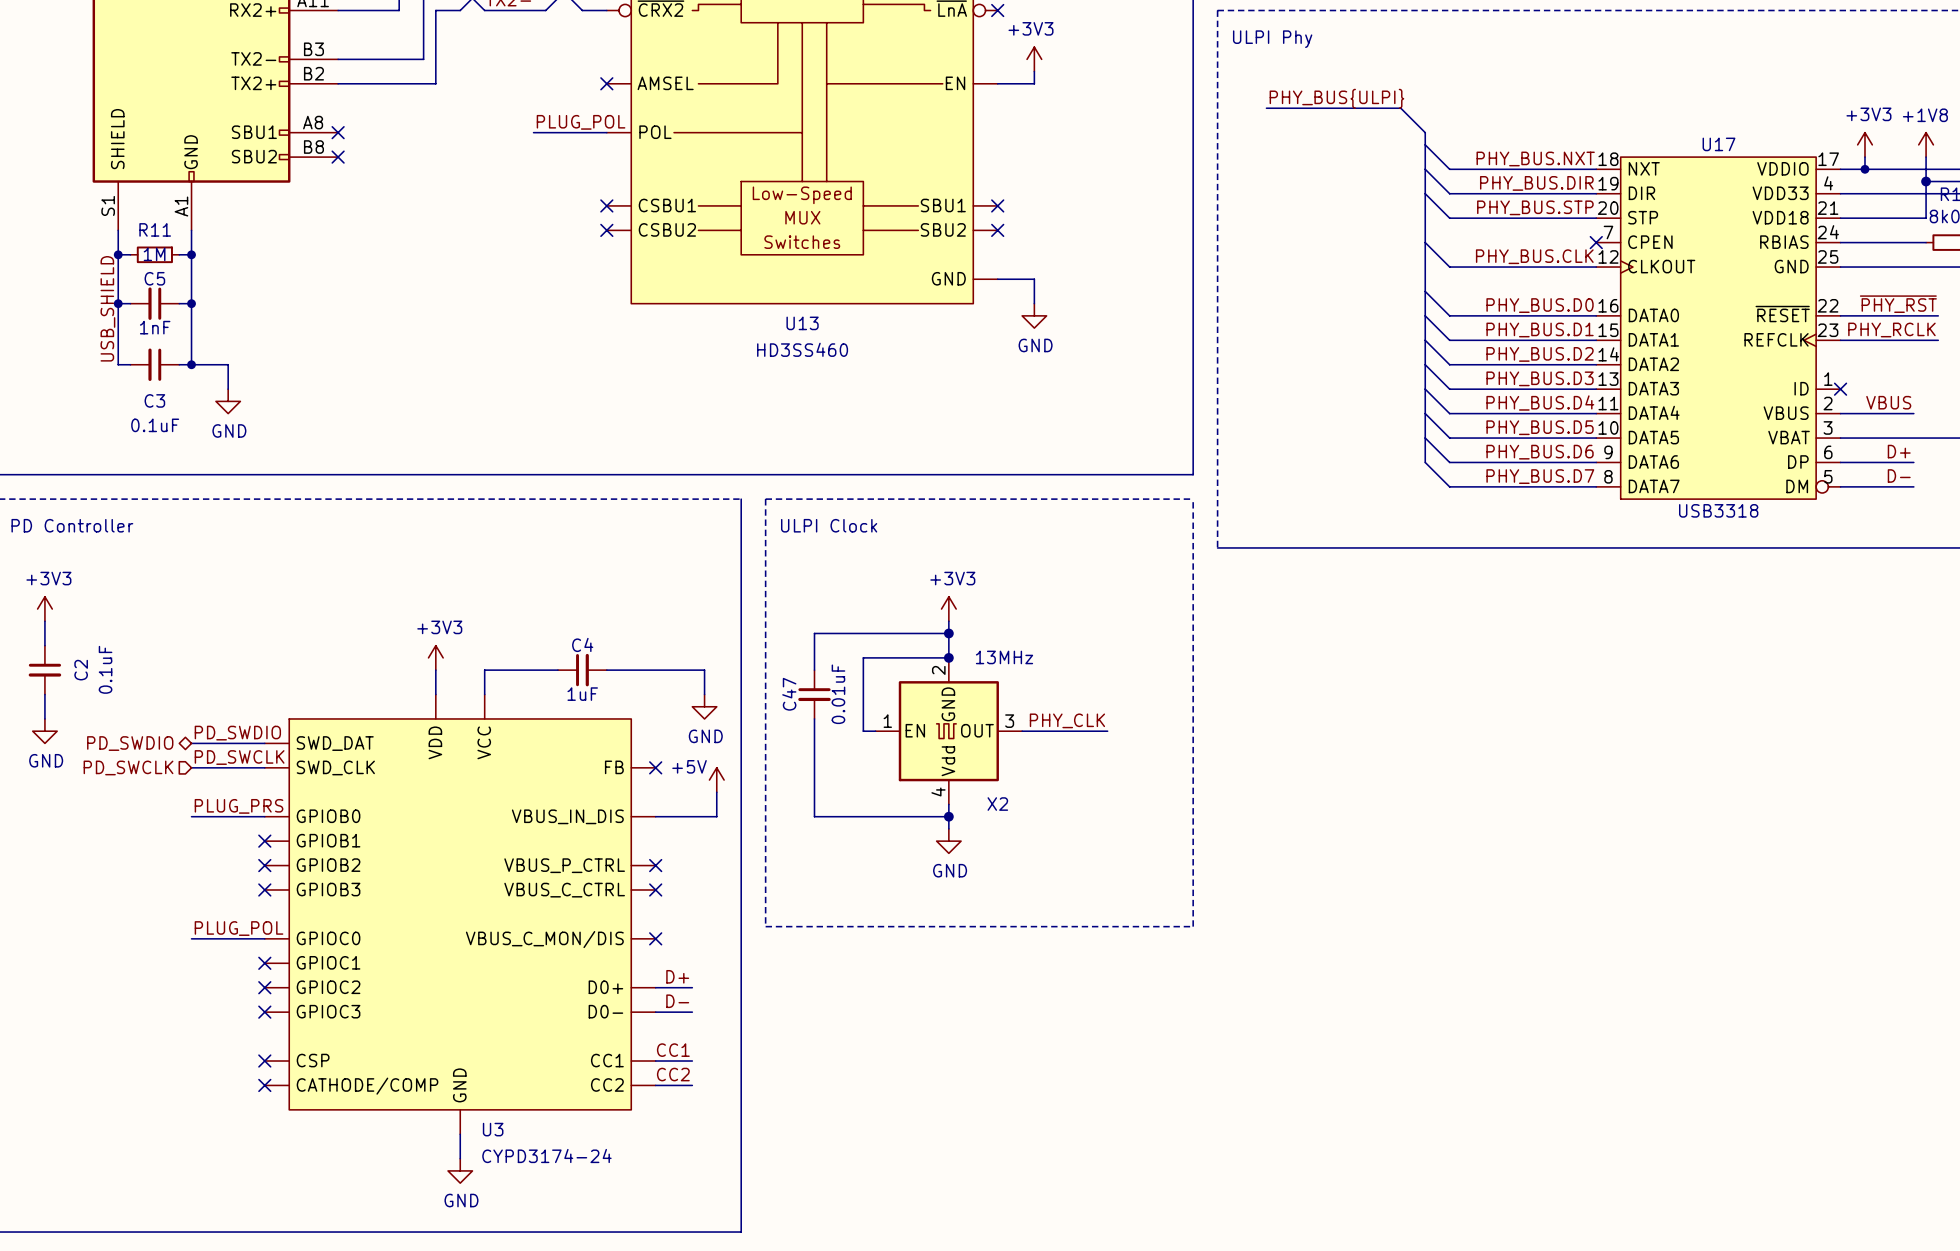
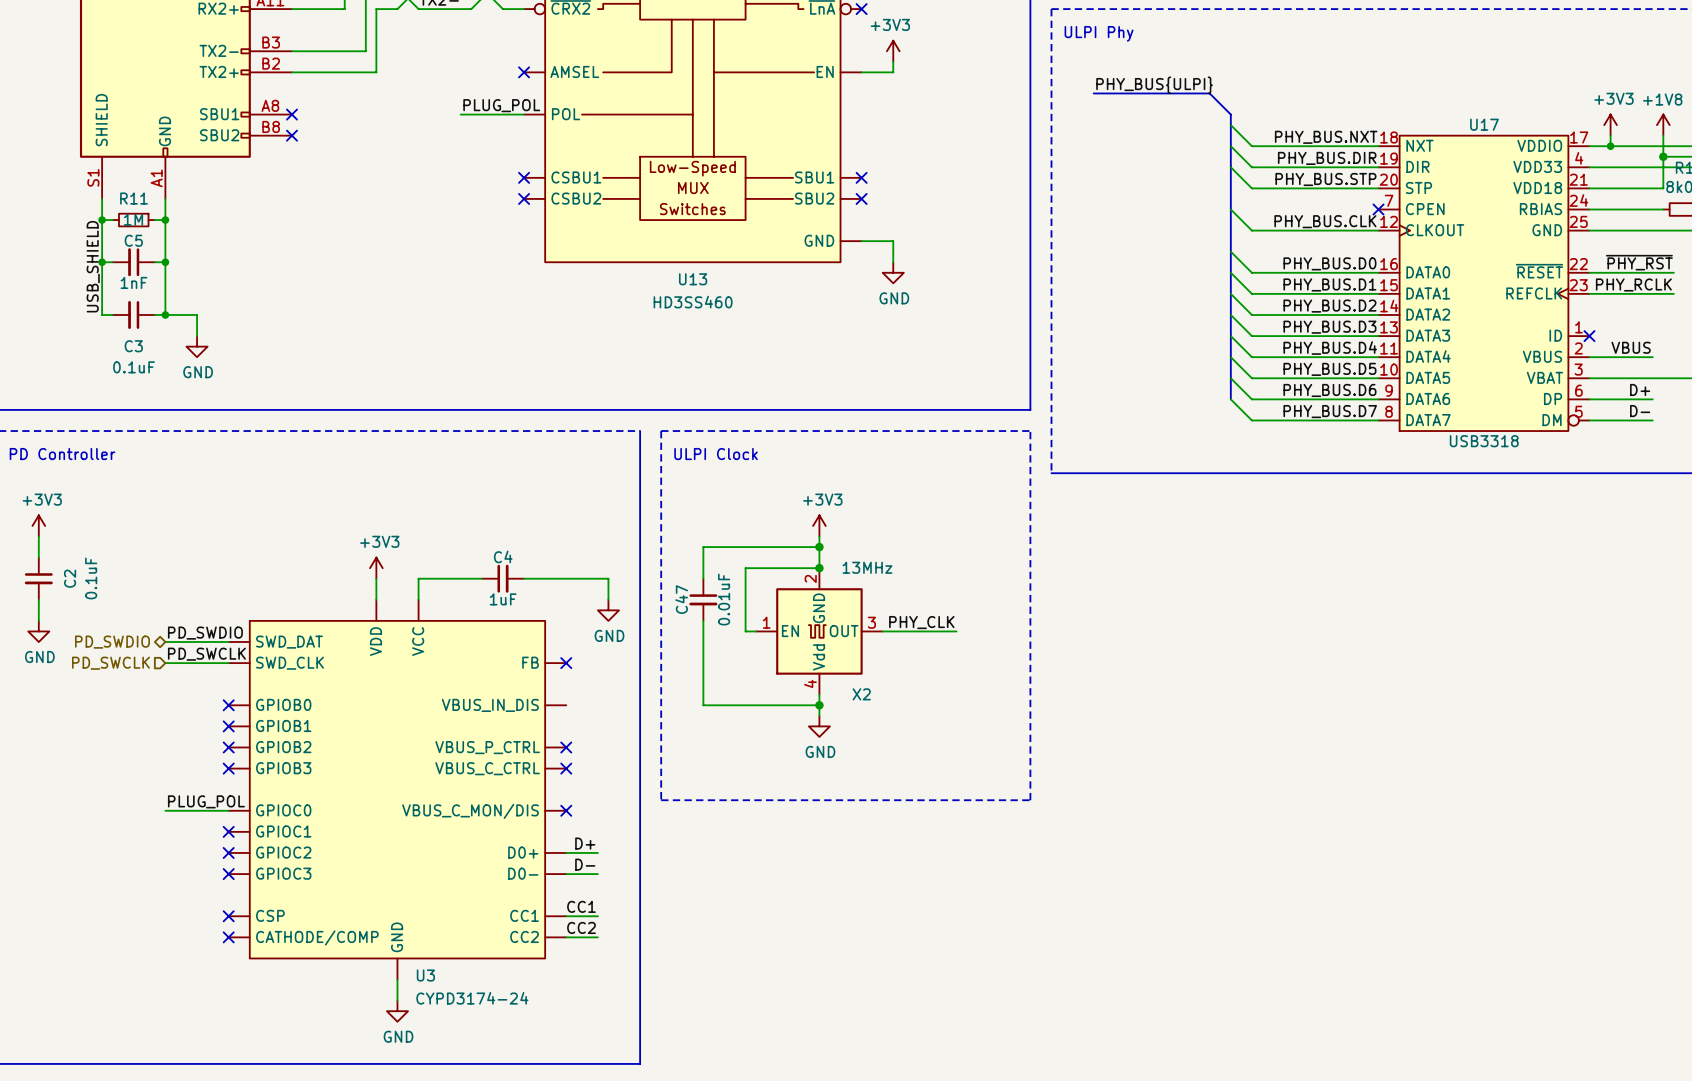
power symbol: +5V (716, 780) -> none
wire: (716, 792) (716, 816) (655, 816) -> none
label: PLUG_PRS (239, 806) -> none
wire: (191, 816) (264, 816) -> none
no-connect mark: none -> (228, 705)

